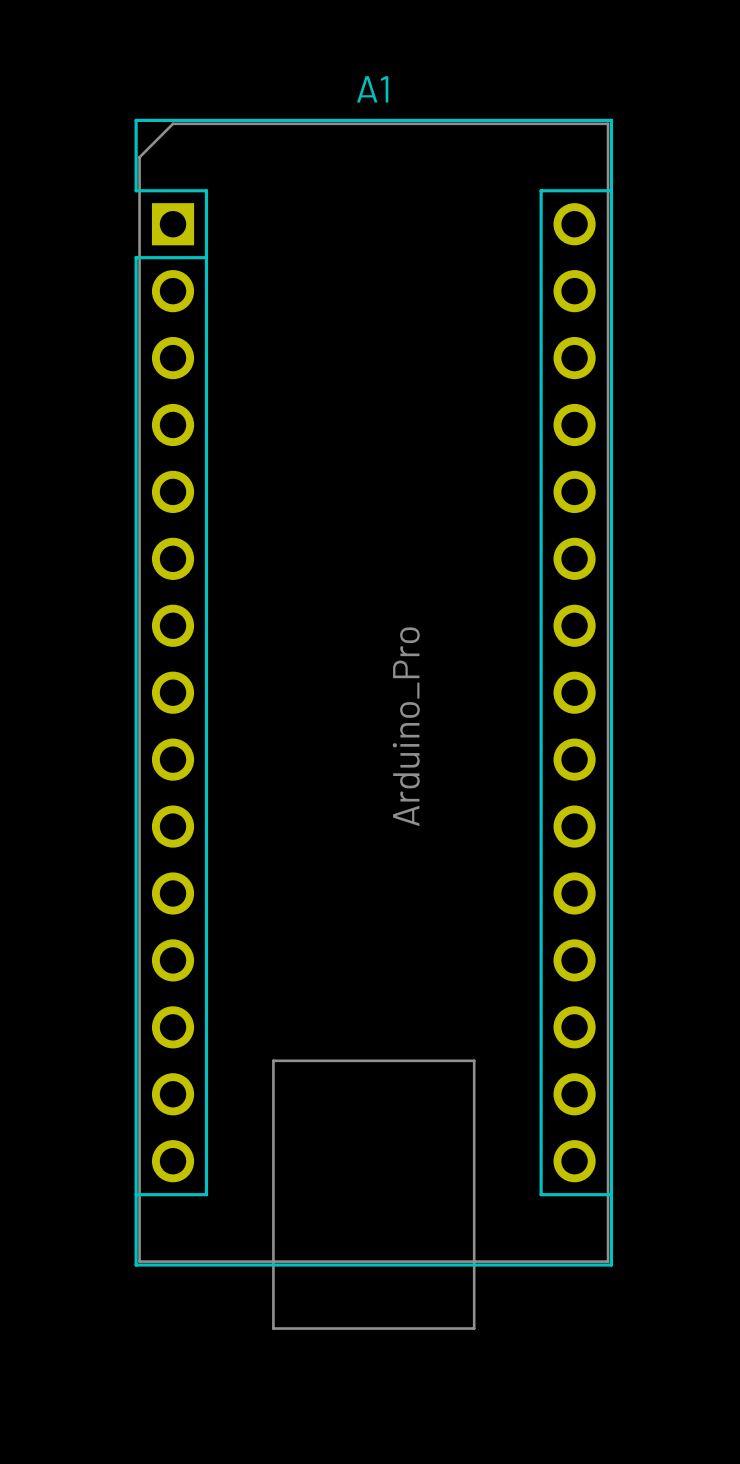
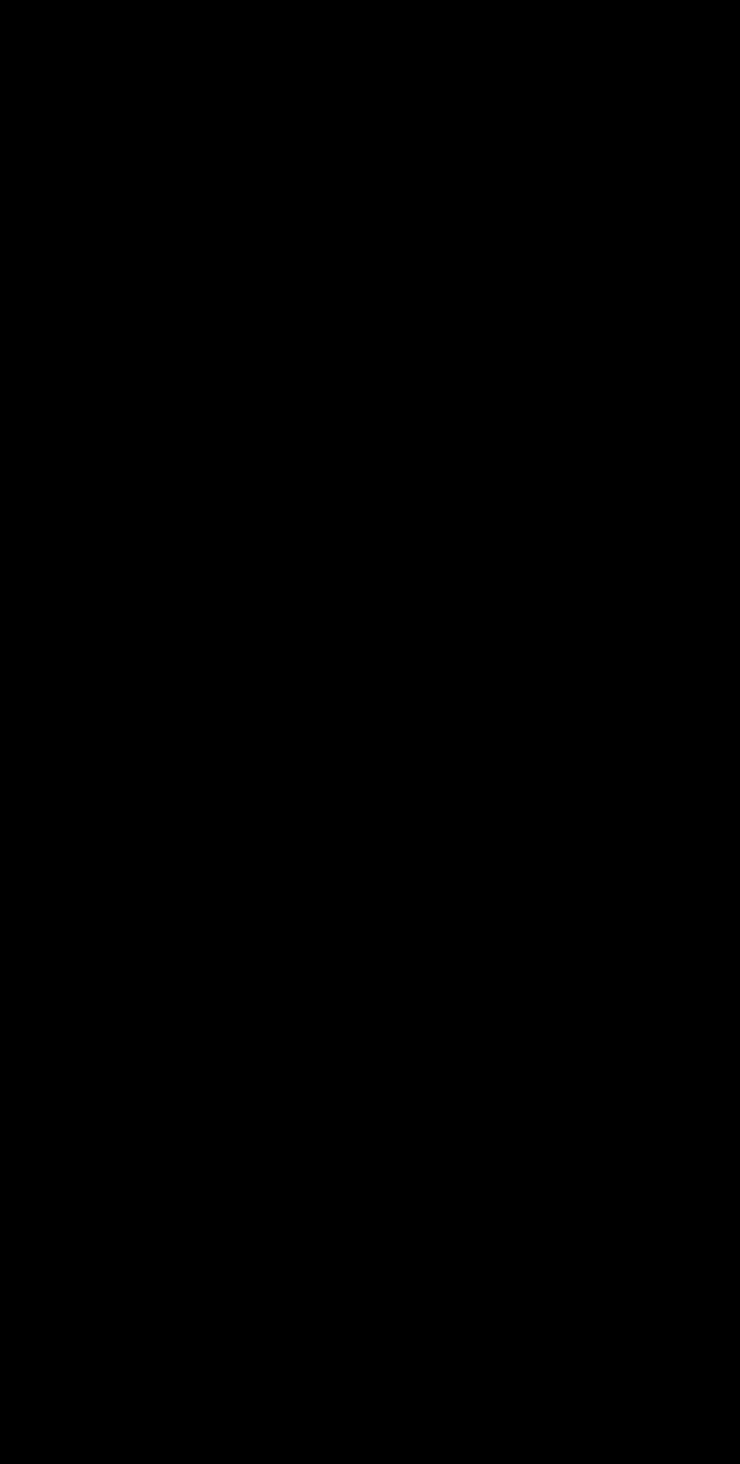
A1: Arduino_Pro (373, 724) -> none

